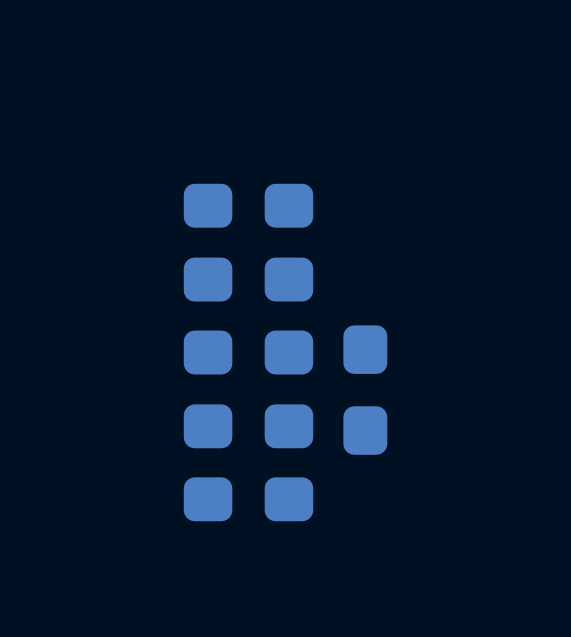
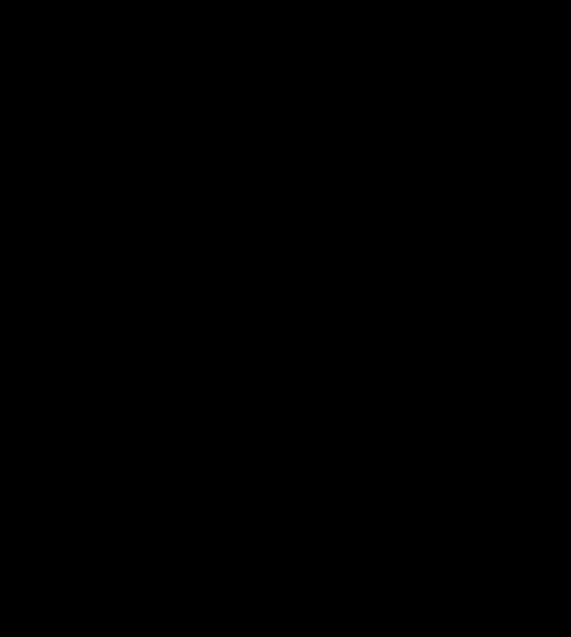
part: (248, 205) -> none
part: (248, 279) -> none
part: (248, 352) -> none
part: (365, 390) -> none
part: (248, 426) -> none
part: (248, 499) -> none

